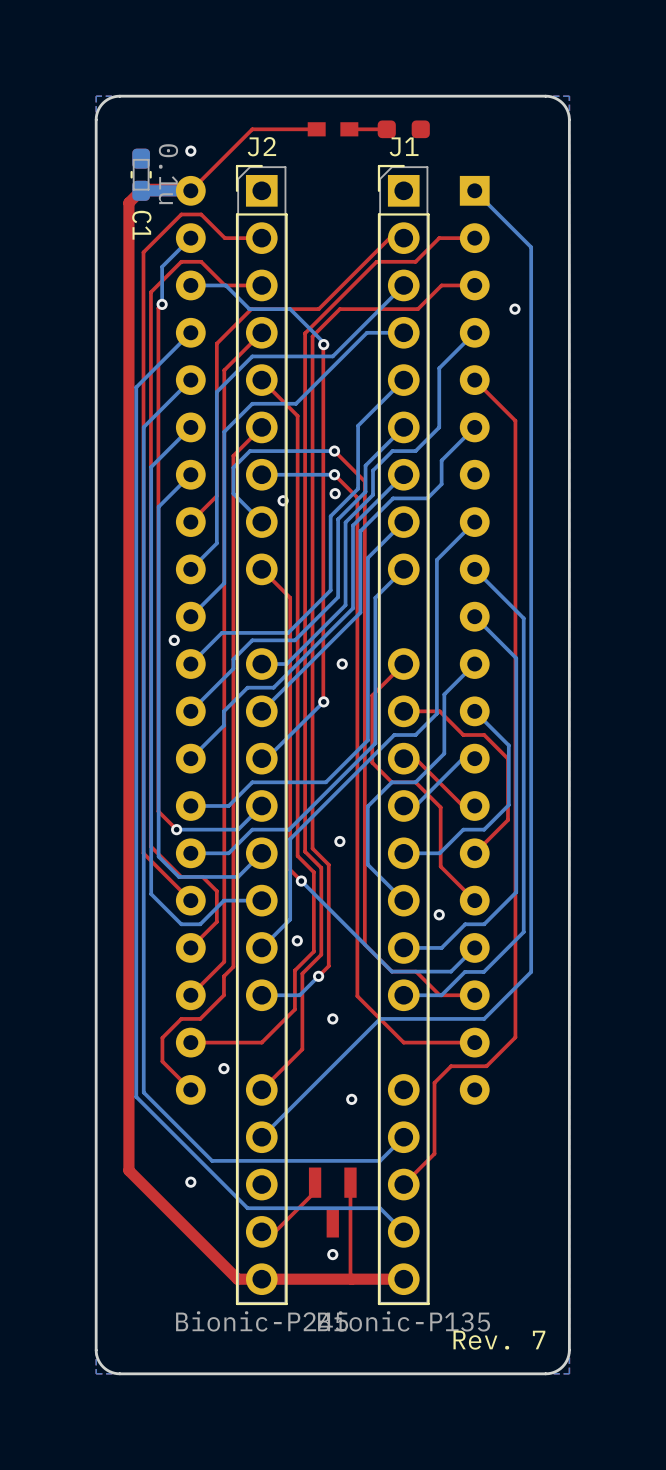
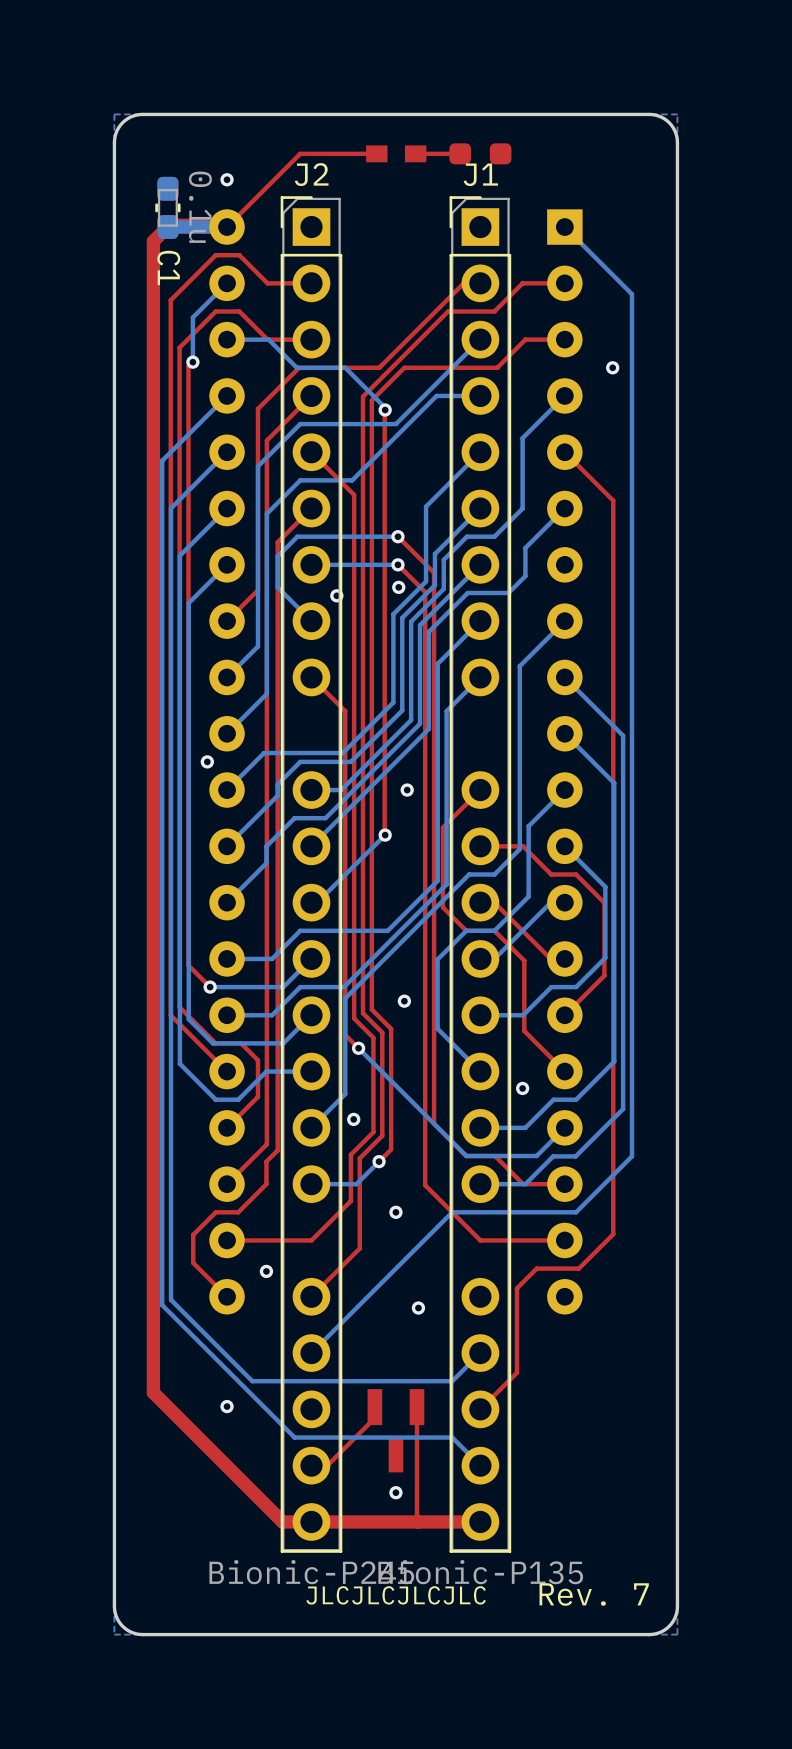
text: none -> JLCJLCJLCJLC (396, 1595)

